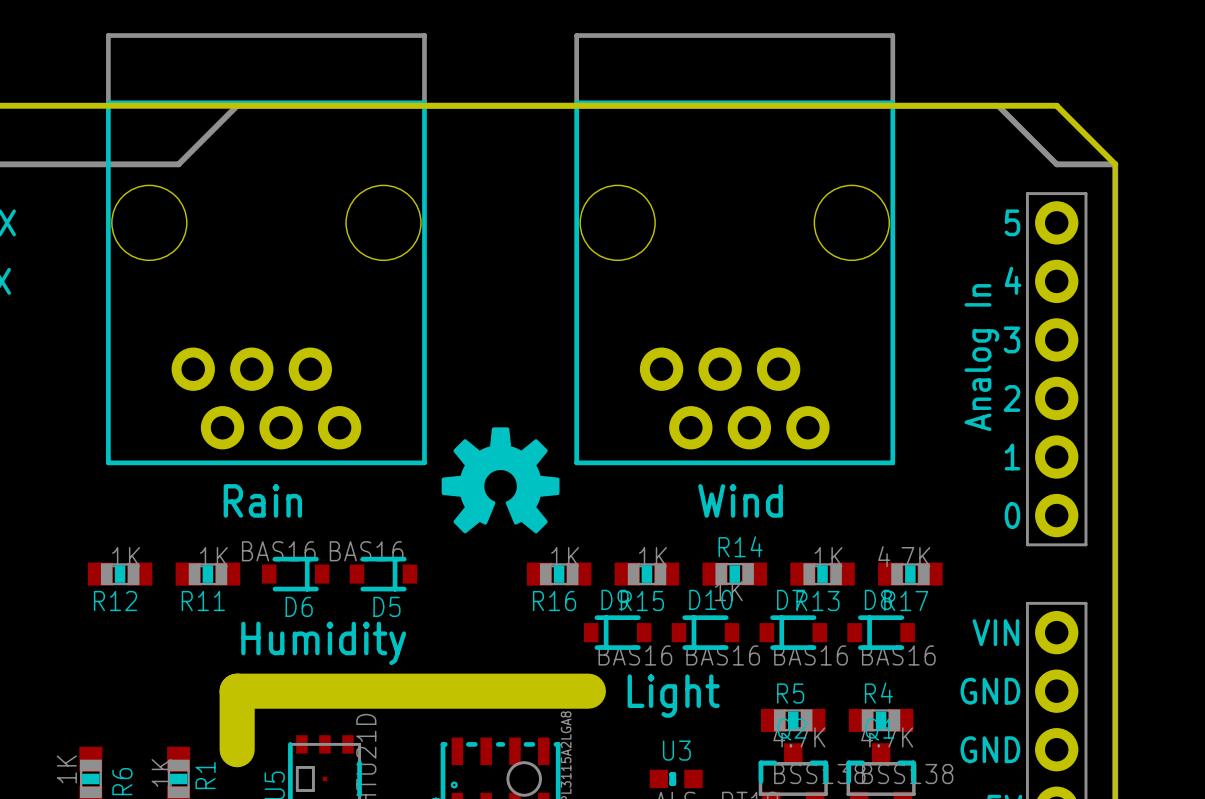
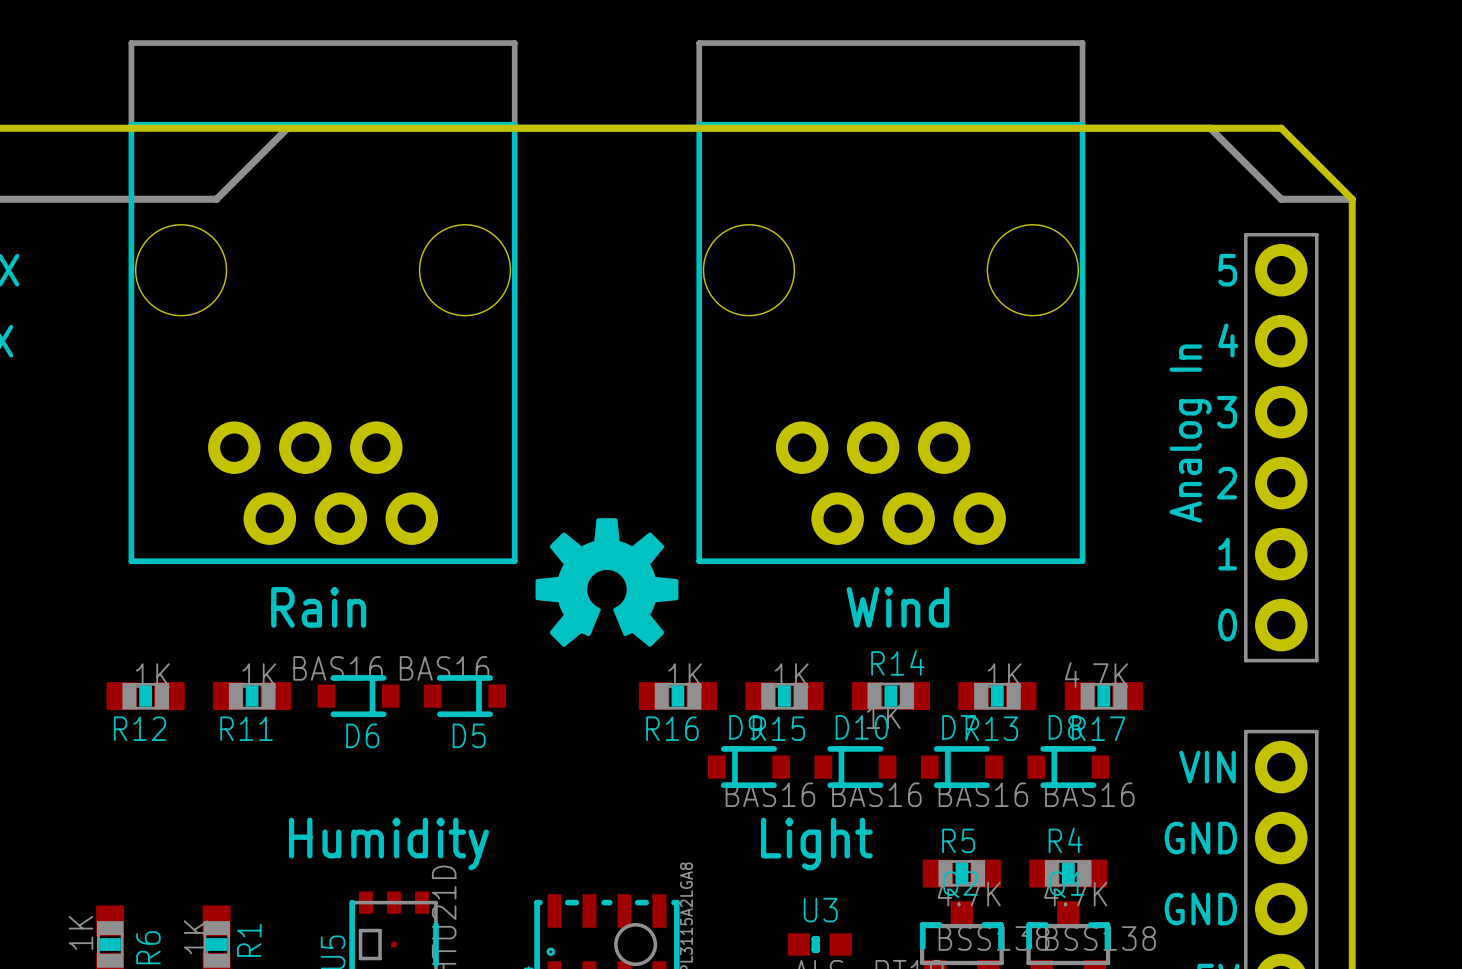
text position: Humidity (323, 643) -> Humidity (388, 843)
board edge: (588, 691) (237, 691) (237, 749) -> none

